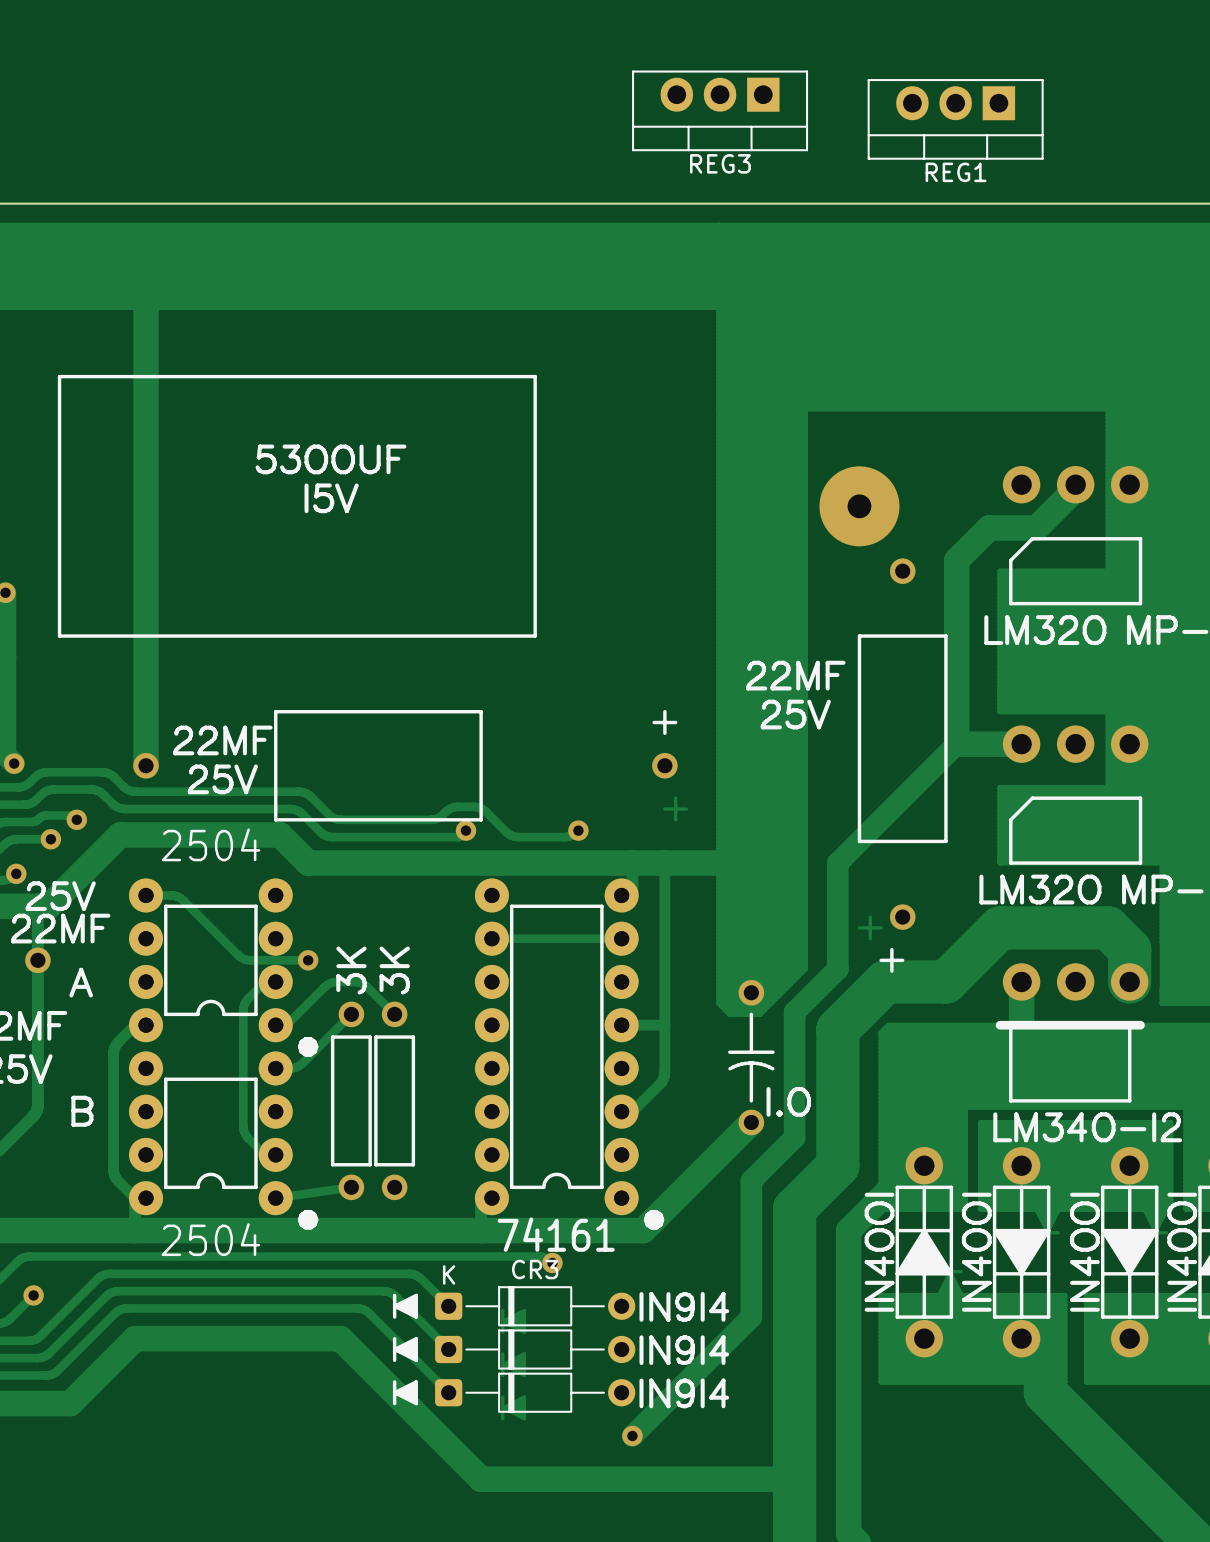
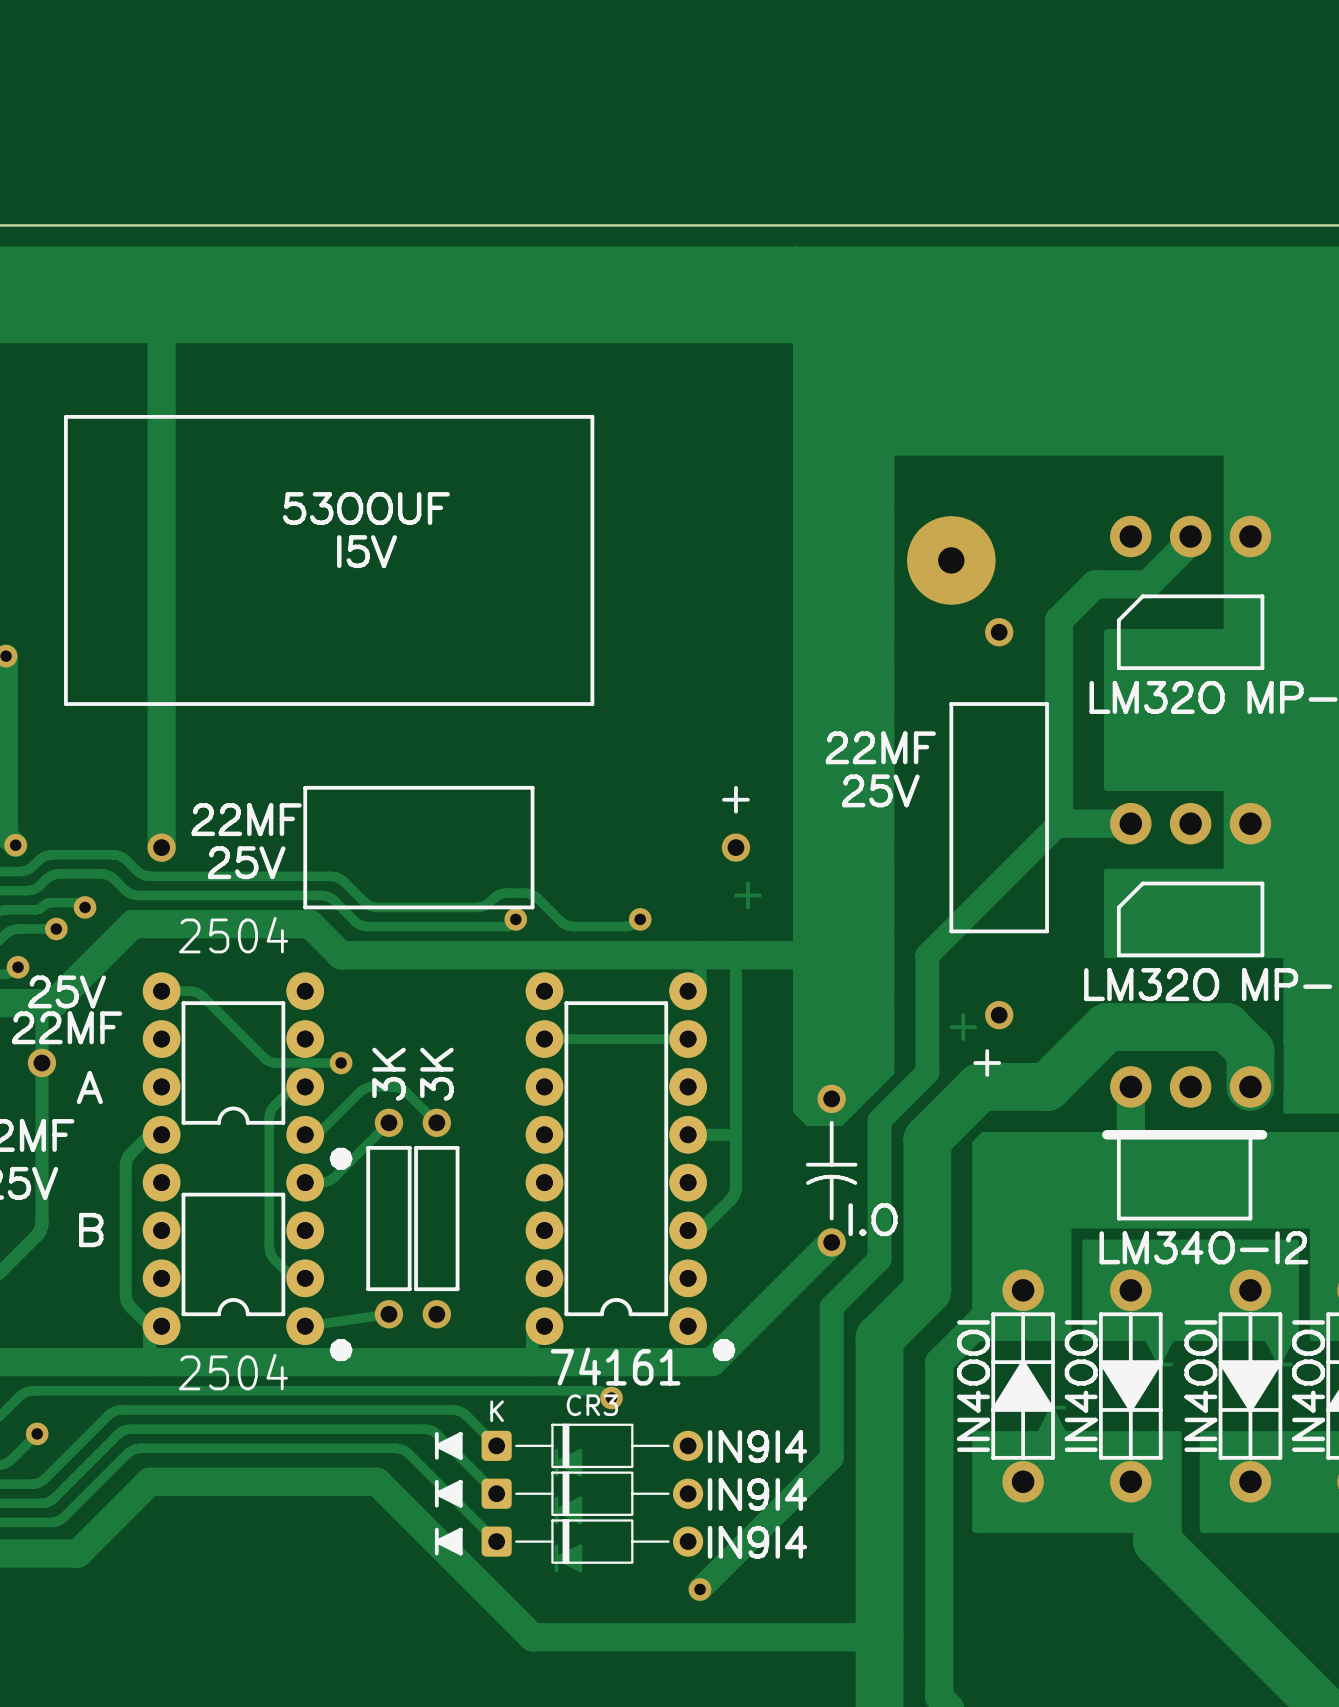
REG3: (720, 110) -> none
REG1: (955, 119) -> none

